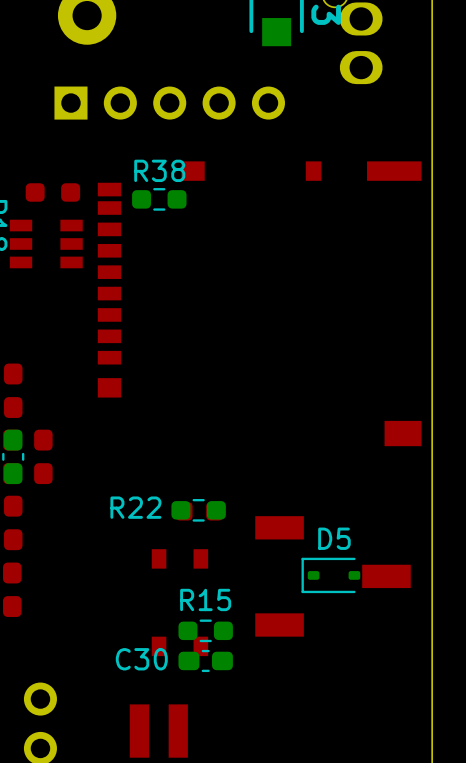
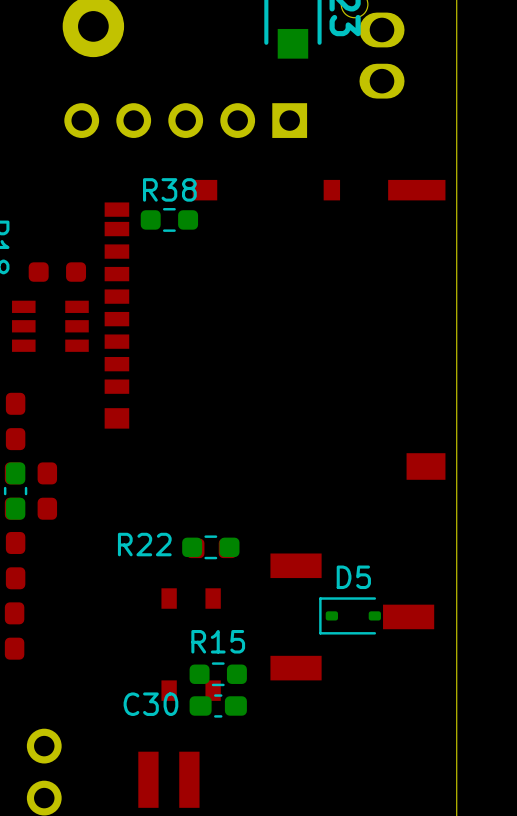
part rotation: 0° (169, 103) -> 180° (185, 120)
part: (52, 192) -> none
part footprint: [9, 219, 83, 269] -> [28, 262, 87, 282]
part: none -> (50, 326)

